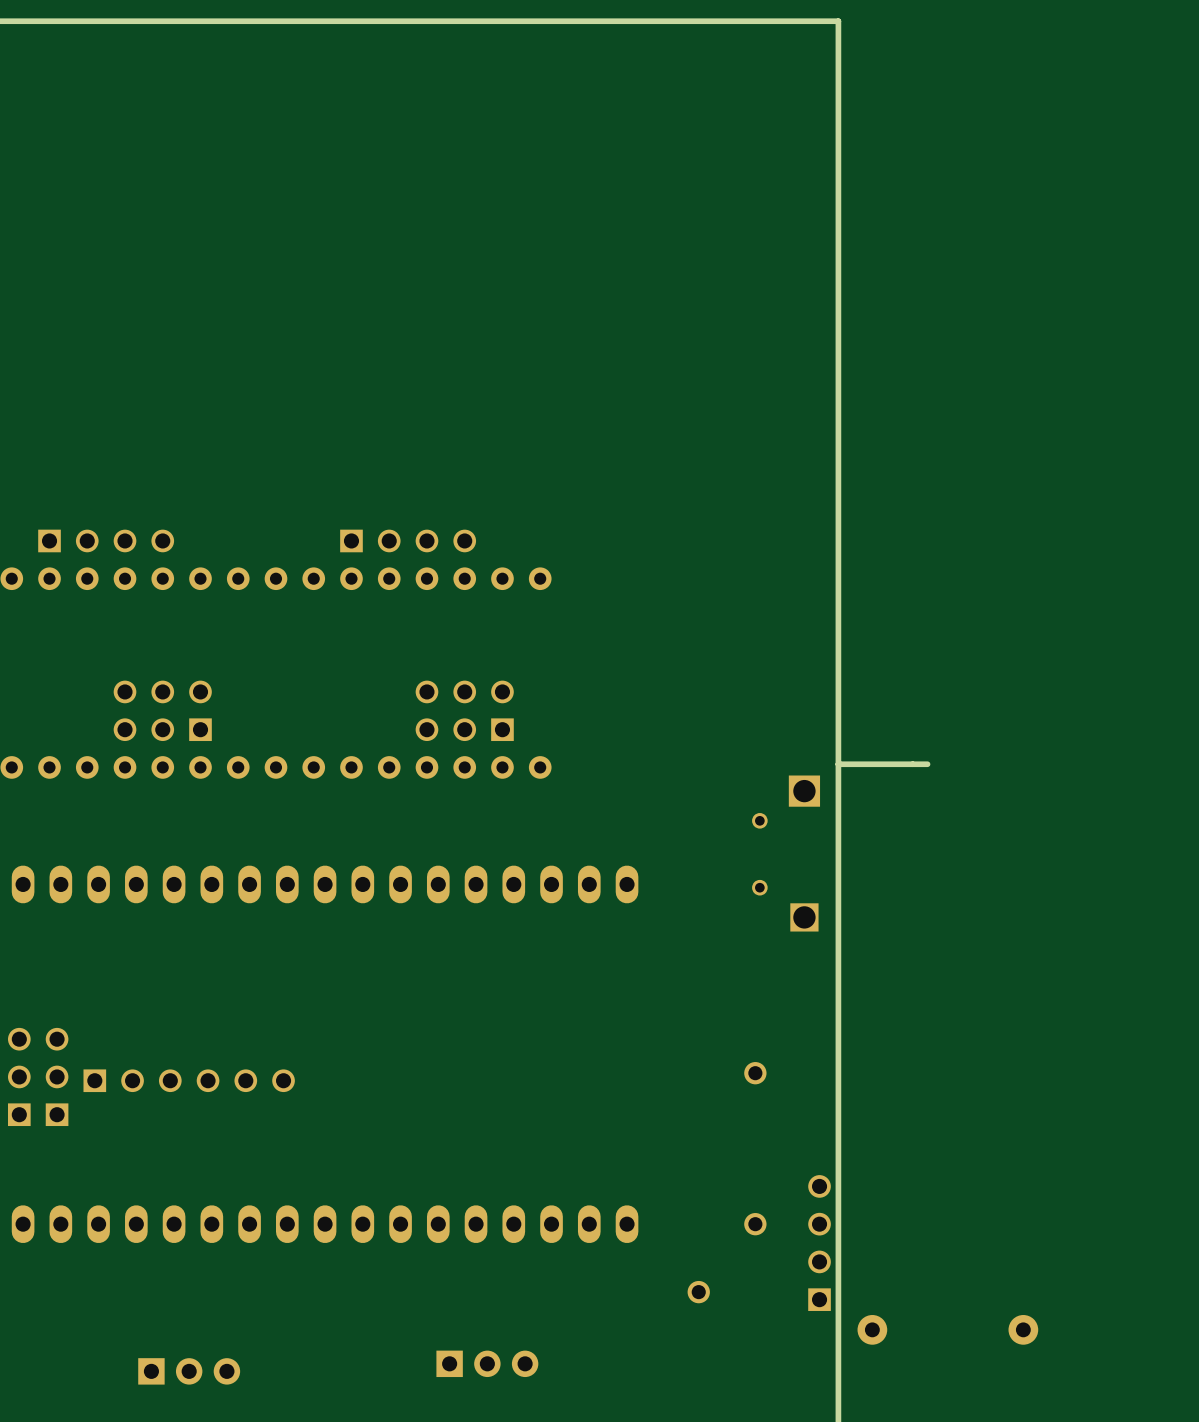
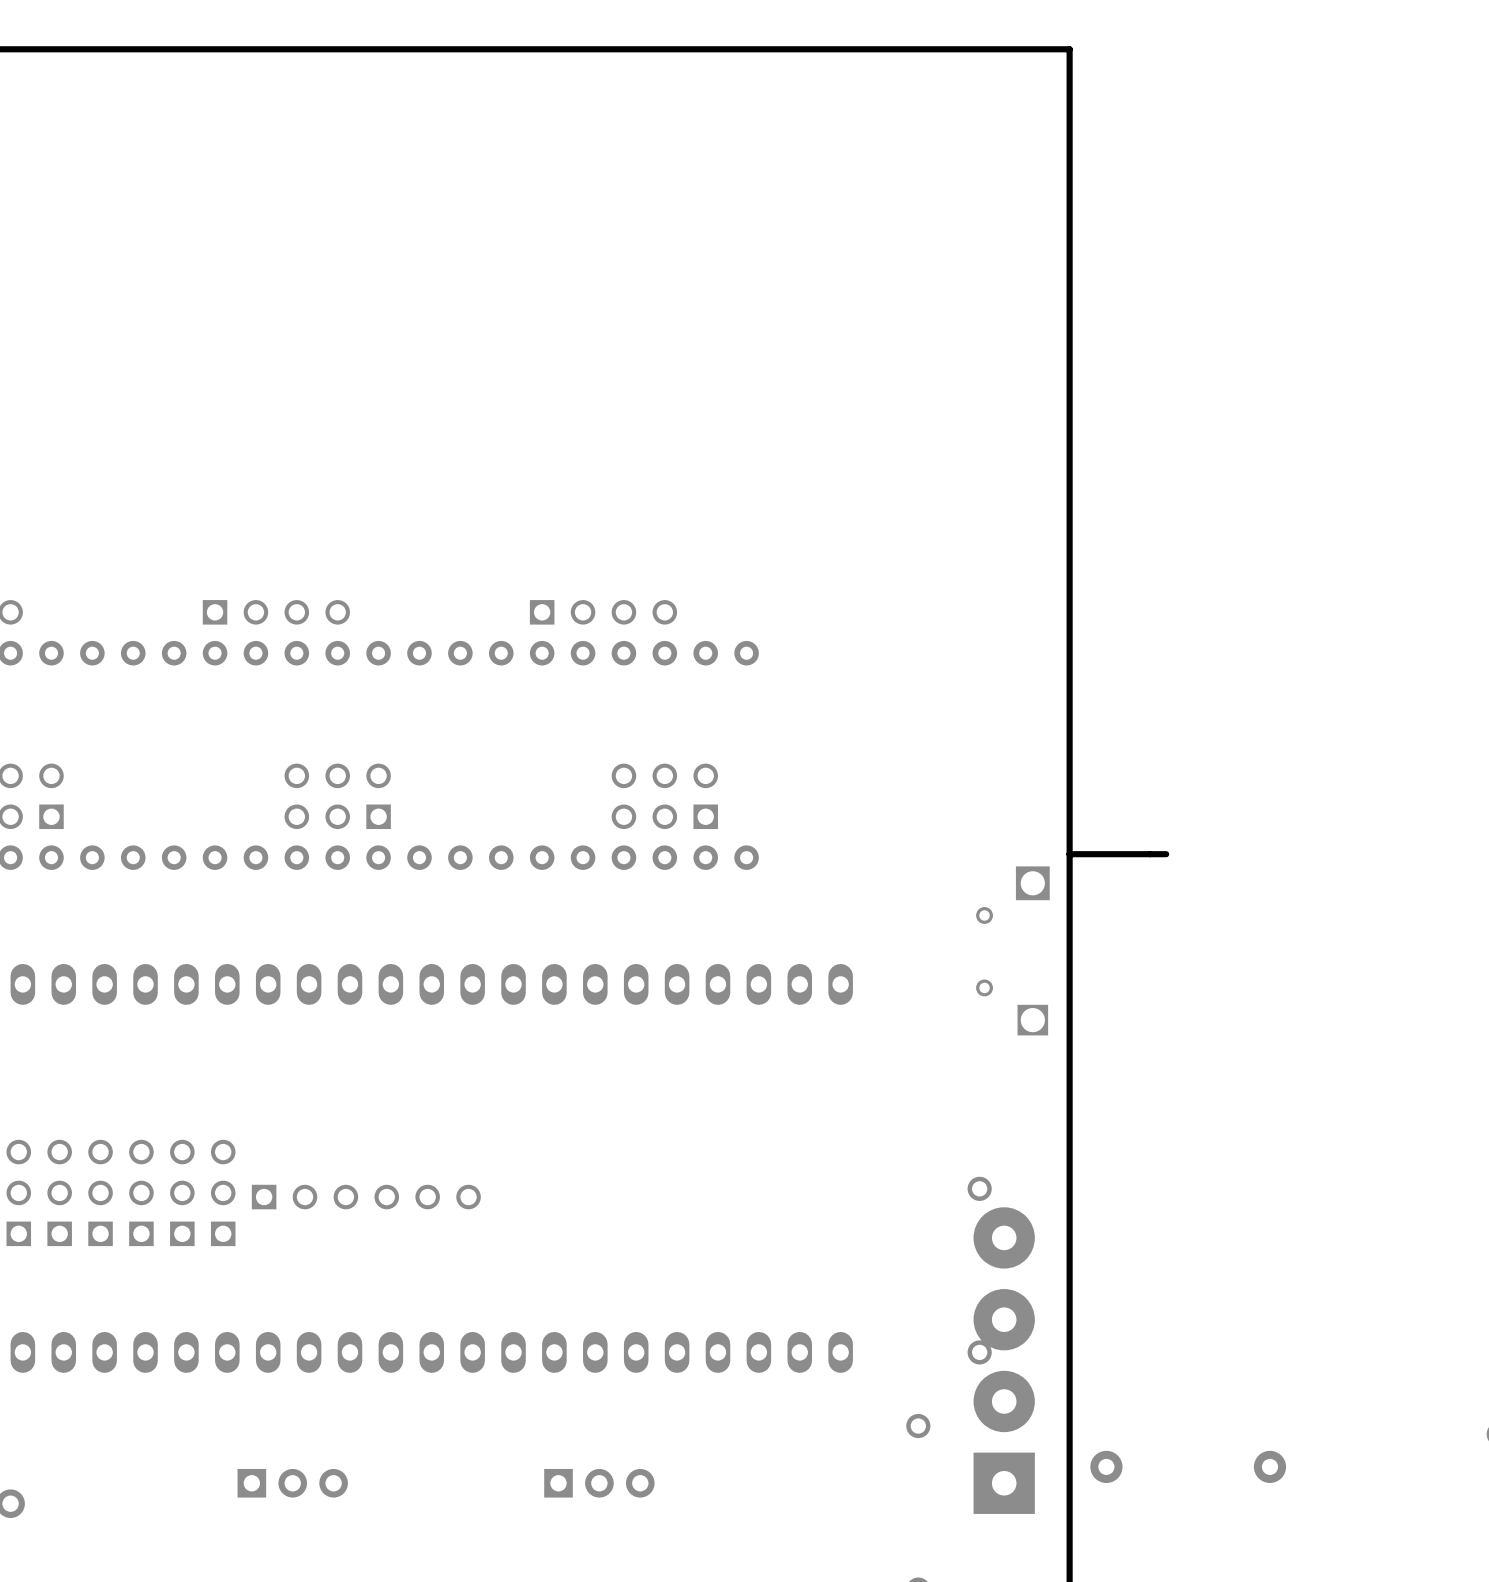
part: none -> (1004, 1360)
part: (819, 1243) -> none
part position: (487, 1363) -> (599, 1483)
part position: (189, 1371) -> (292, 1483)

